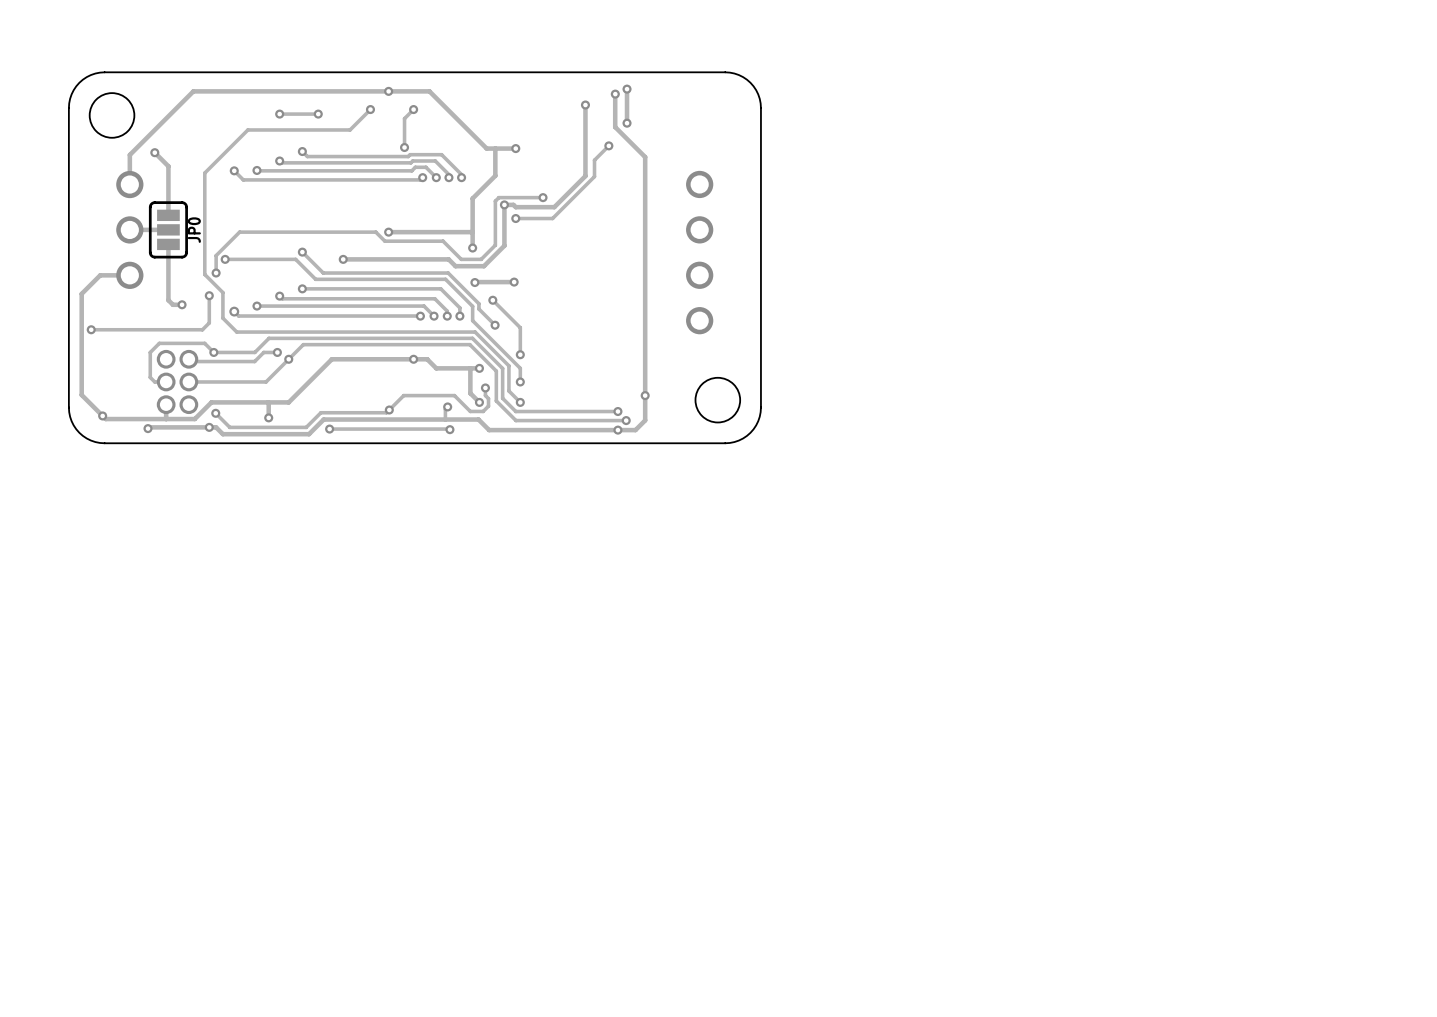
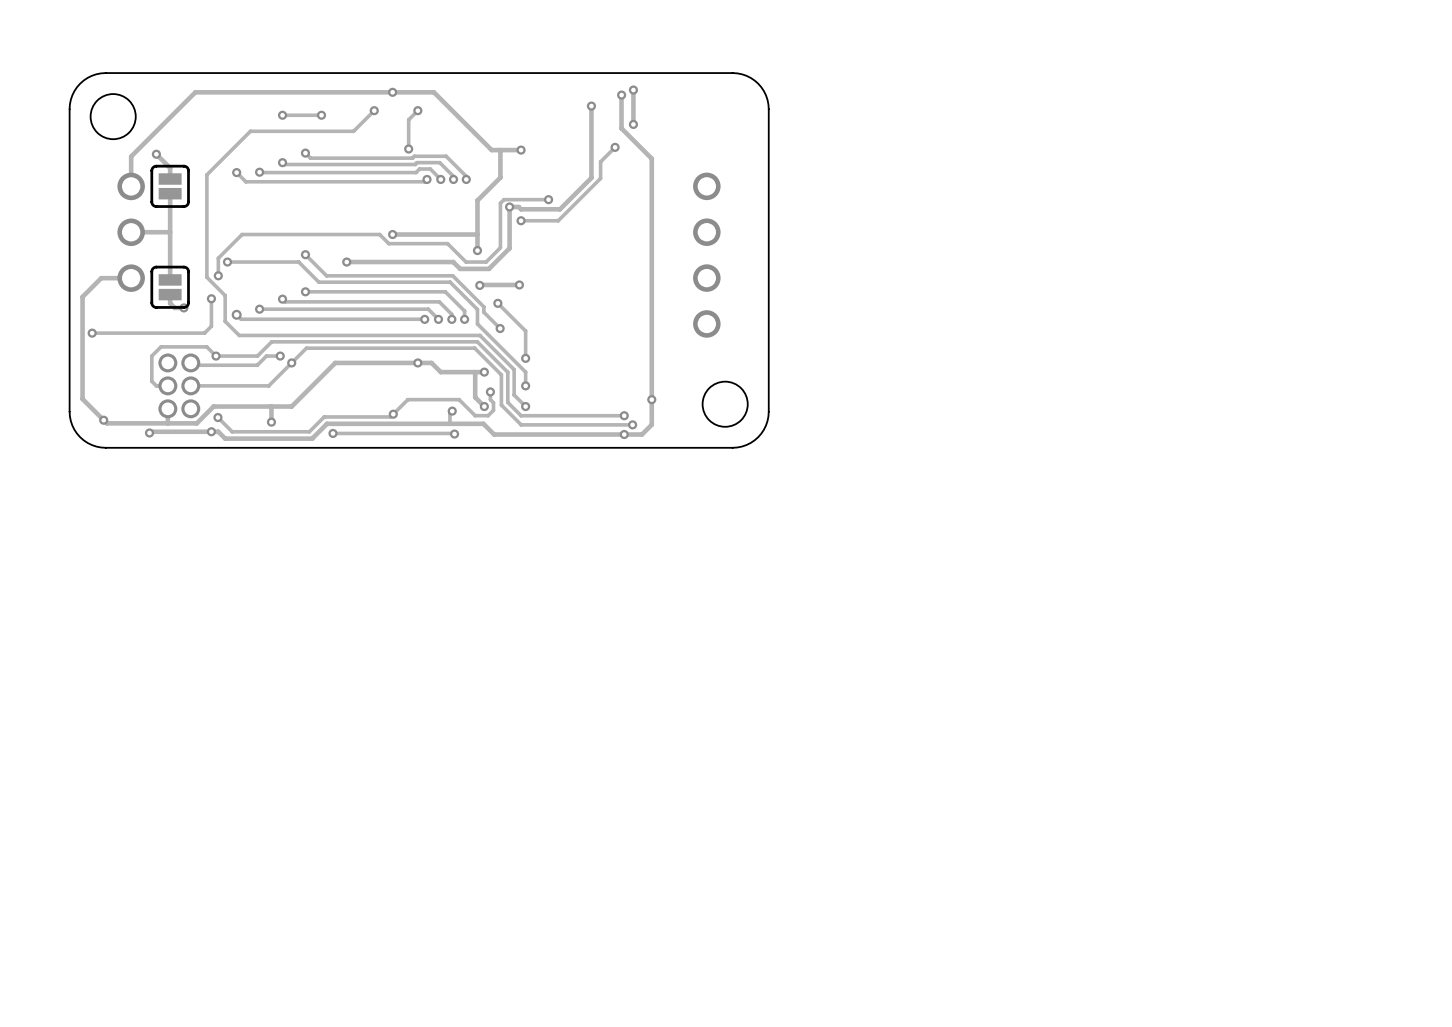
track: (168, 177) (168, 191) -> none
part: none -> (170, 186)
track: none -> (170, 217) (170, 246)
JP0: (168, 229) -> none
track: (168, 277) (168, 291) -> none
part: none -> (170, 287)

